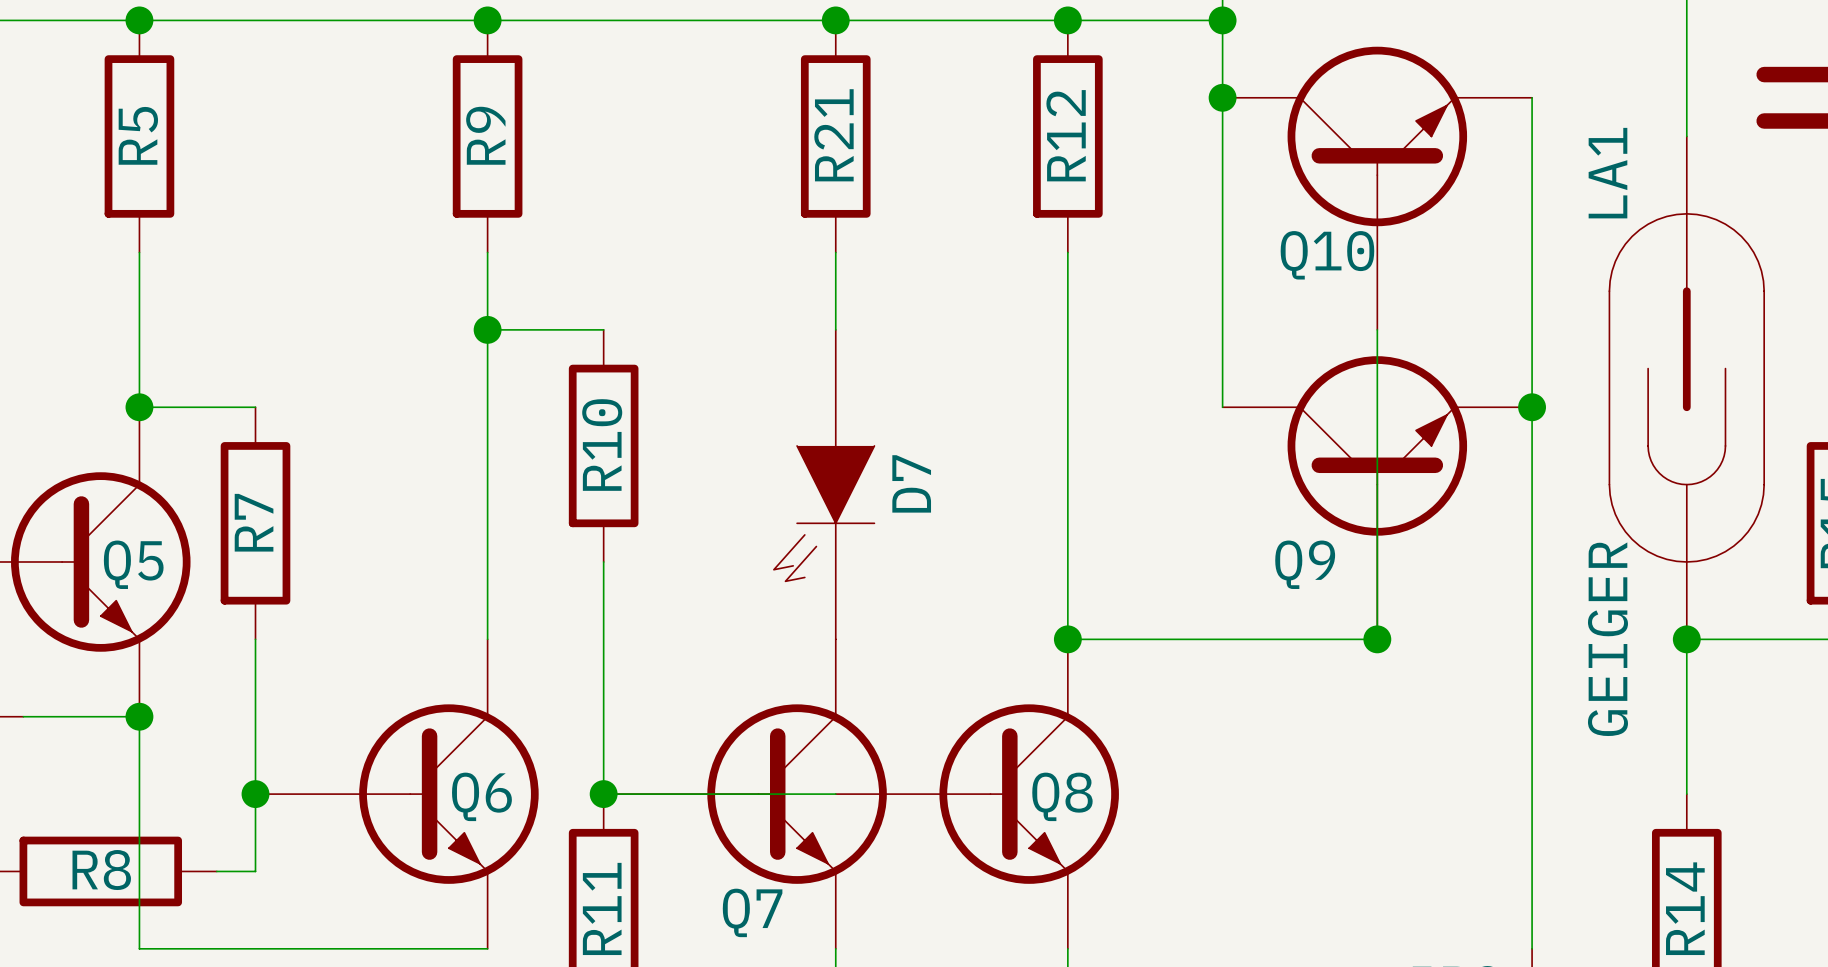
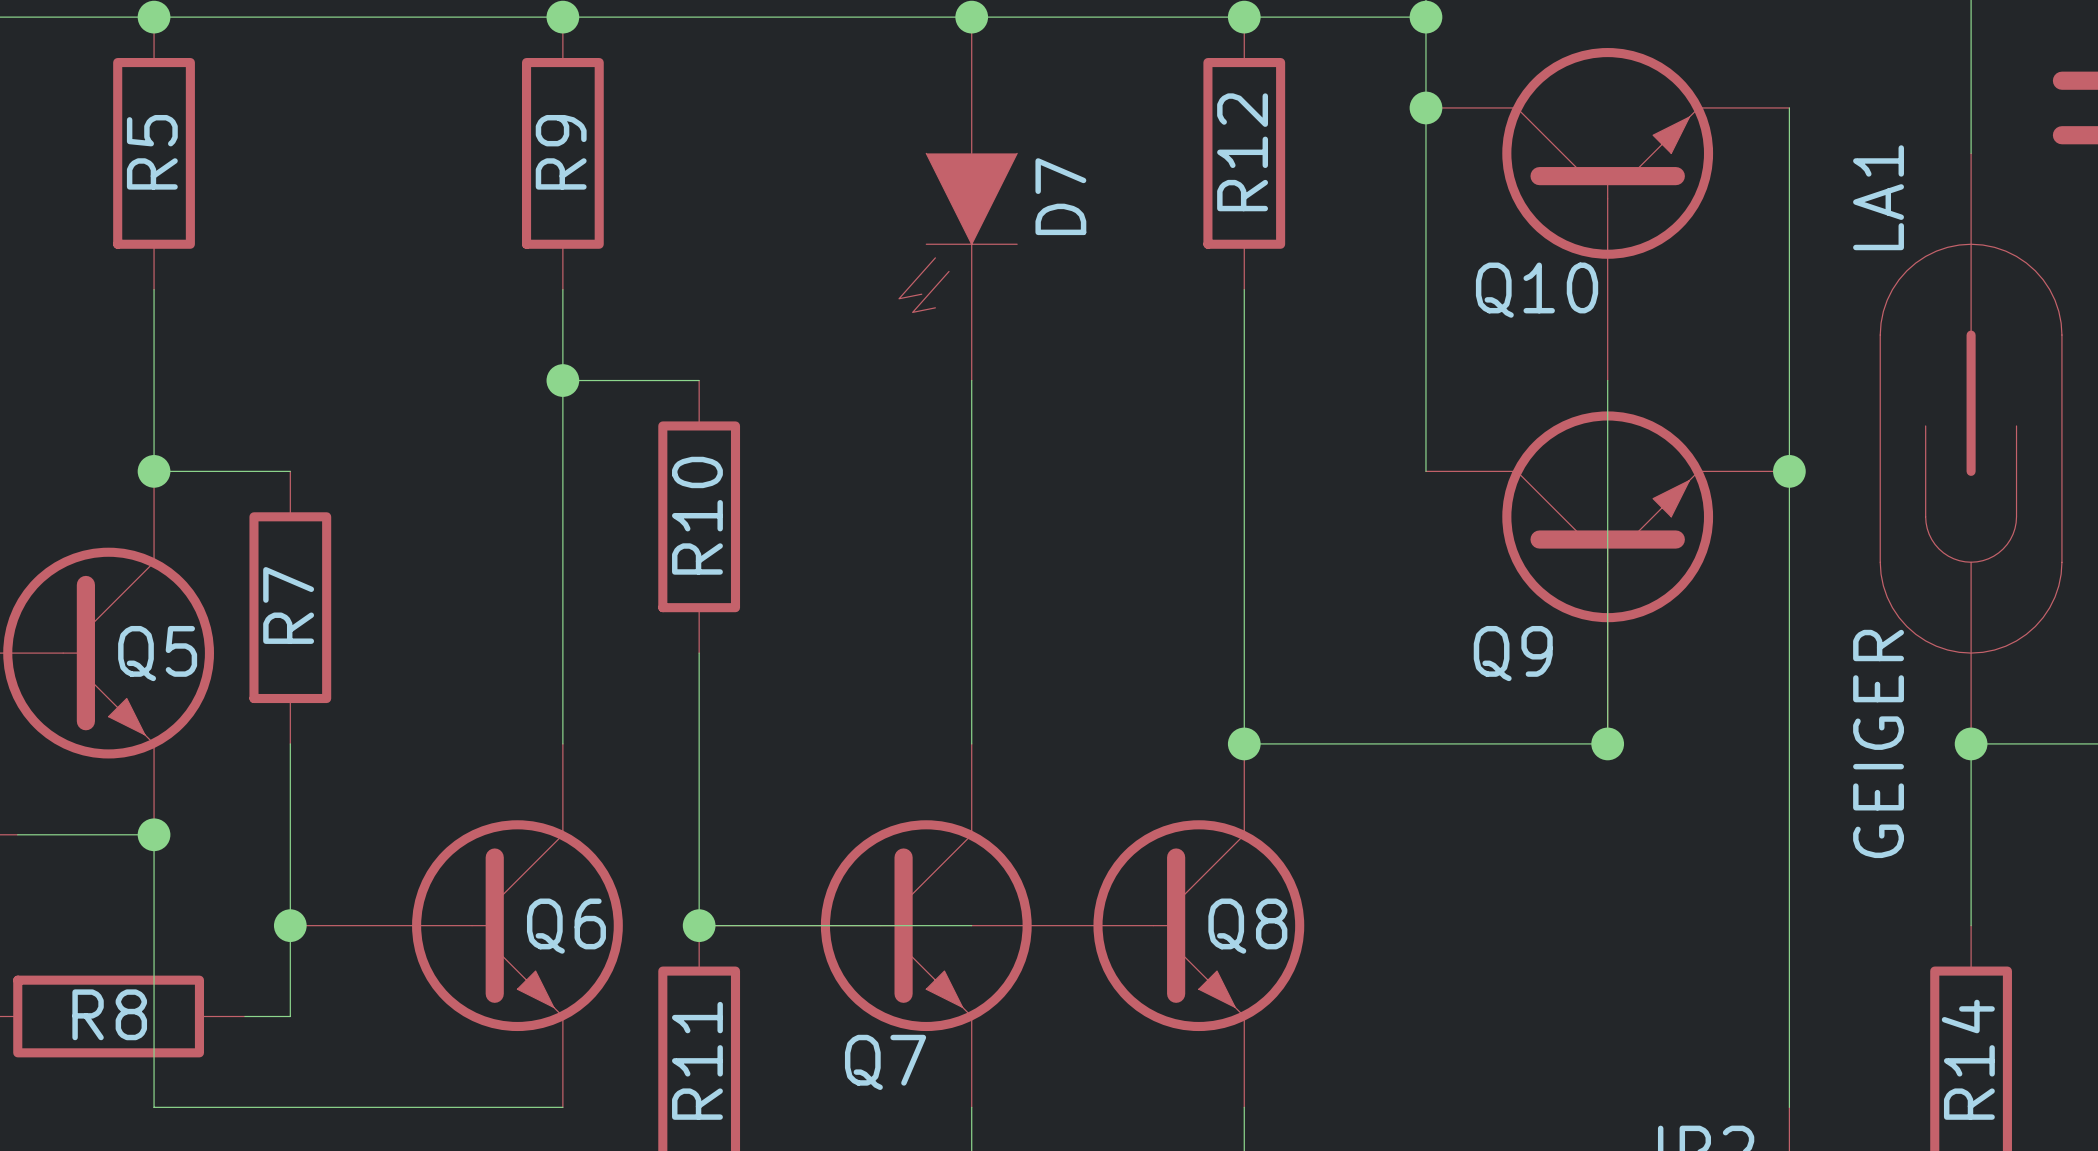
R21: (835, 136) -> none
D7 position: (824, 484) -> (958, 198)

